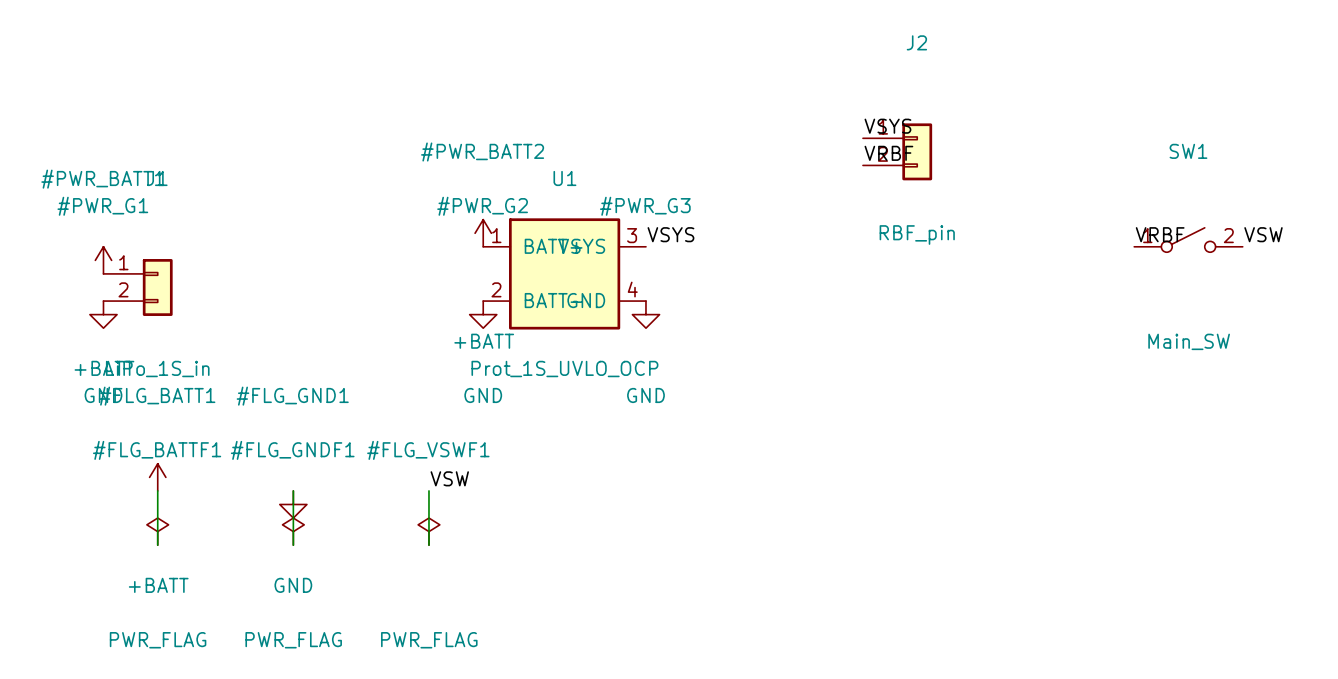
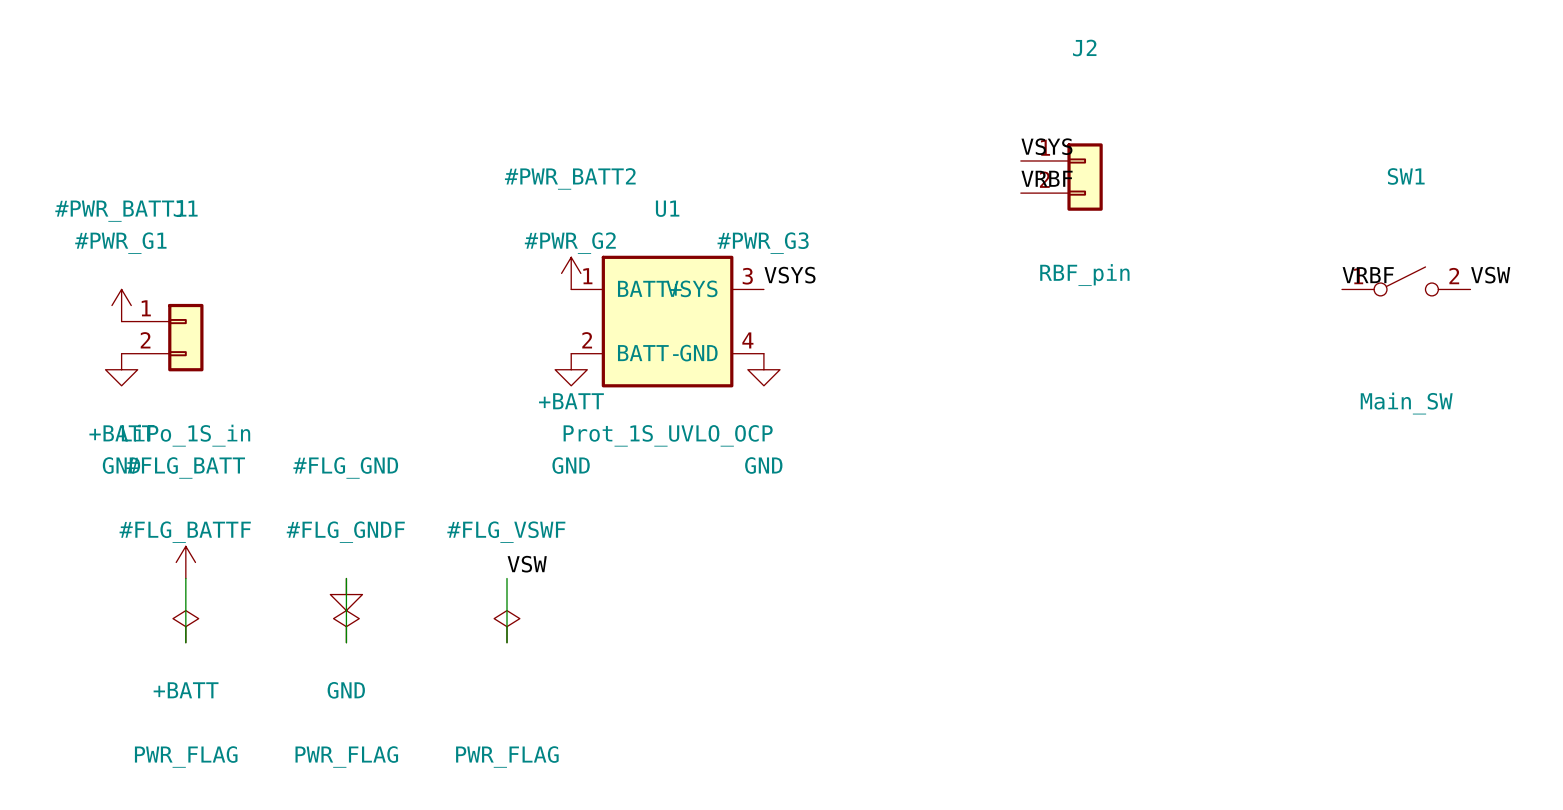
#FLG_BATT1 name: #FLG_BATT1 (157, 396) -> #FLG_BATT (185, 467)
#FLG_GND1 name: #FLG_GND1 (292, 396) -> #FLG_GND (345, 467)
#FLG_BATTF1 name: #FLG_BATTF1 (157, 450) -> #FLG_BATTF (185, 532)
#FLG_GNDF1 name: #FLG_GNDF1 (292, 450) -> #FLG_GNDF (345, 532)
#FLG_VSWF1 name: #FLG_VSWF1 (428, 450) -> #FLG_VSWF (506, 532)

